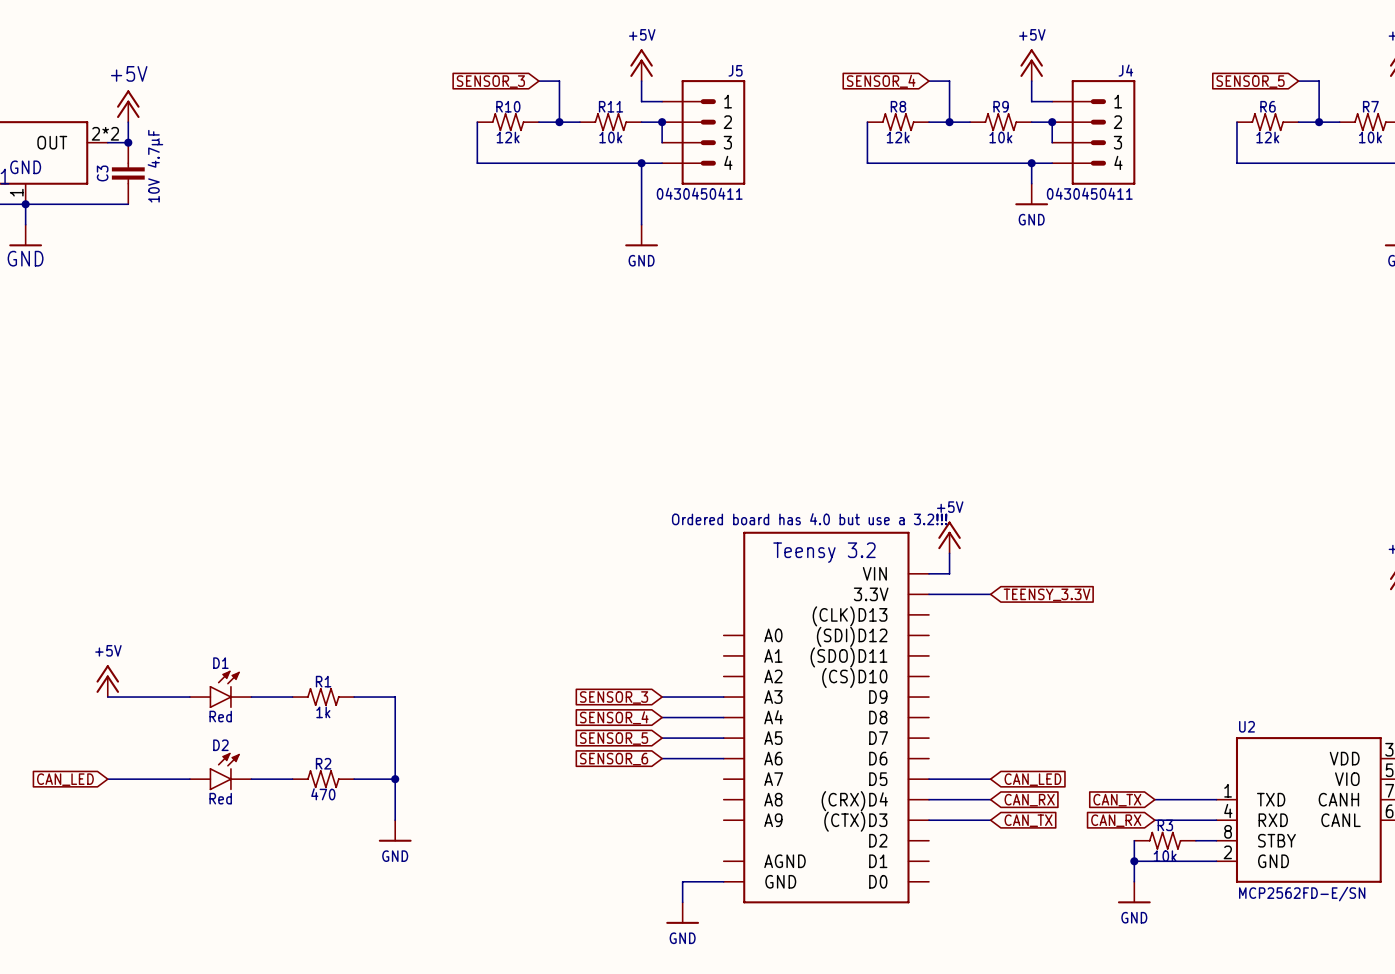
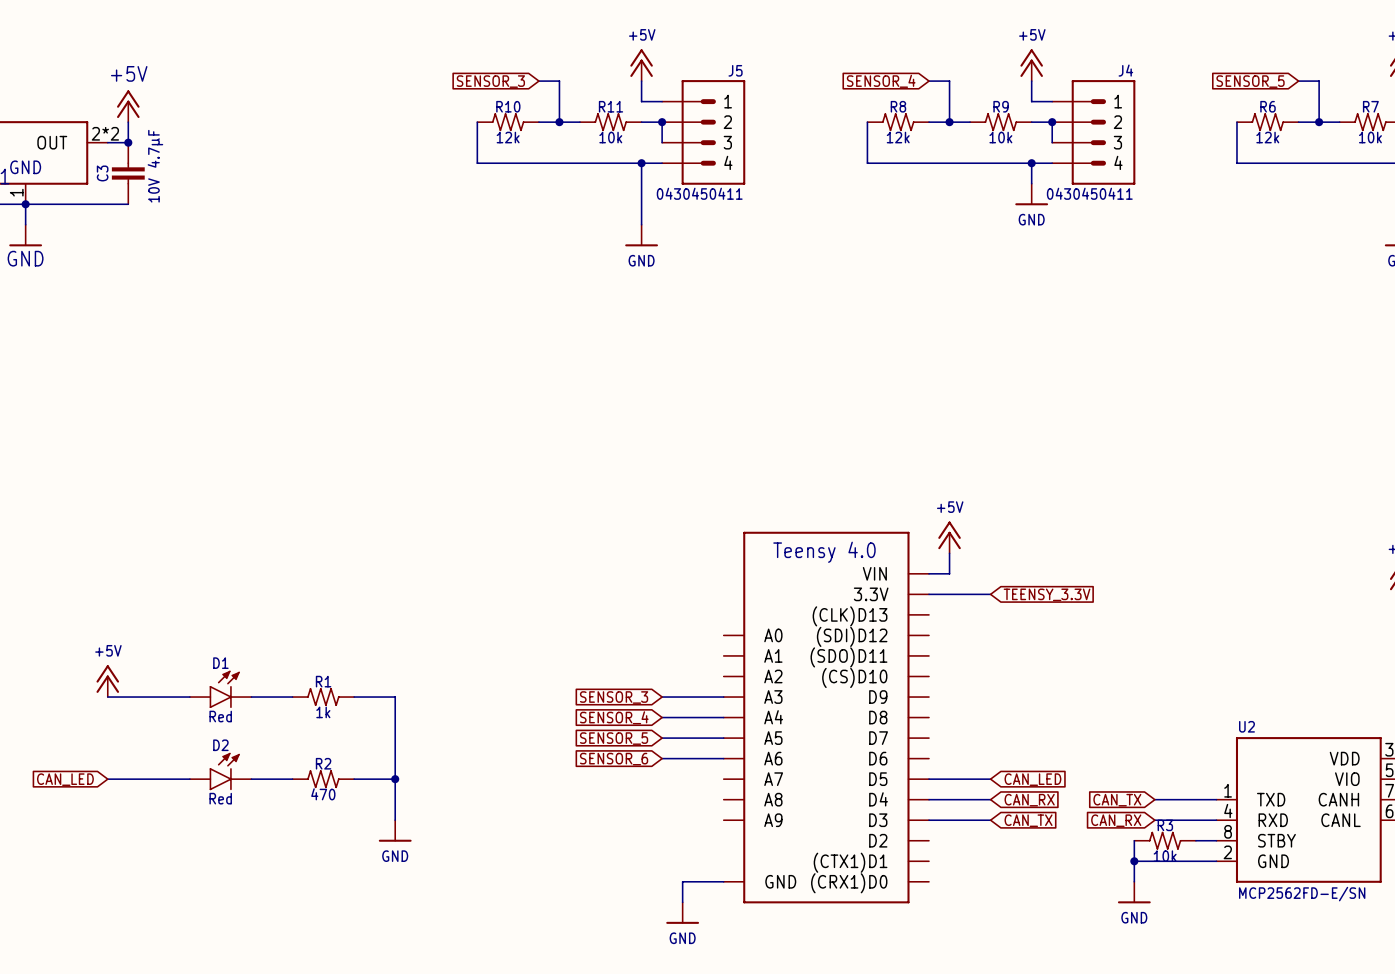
text: Ordered board has 4.0 but use a 3.2!!! (809, 519) -> none
part symbol: [723, 531, 930, 904] -> [723, 531, 930, 904]

